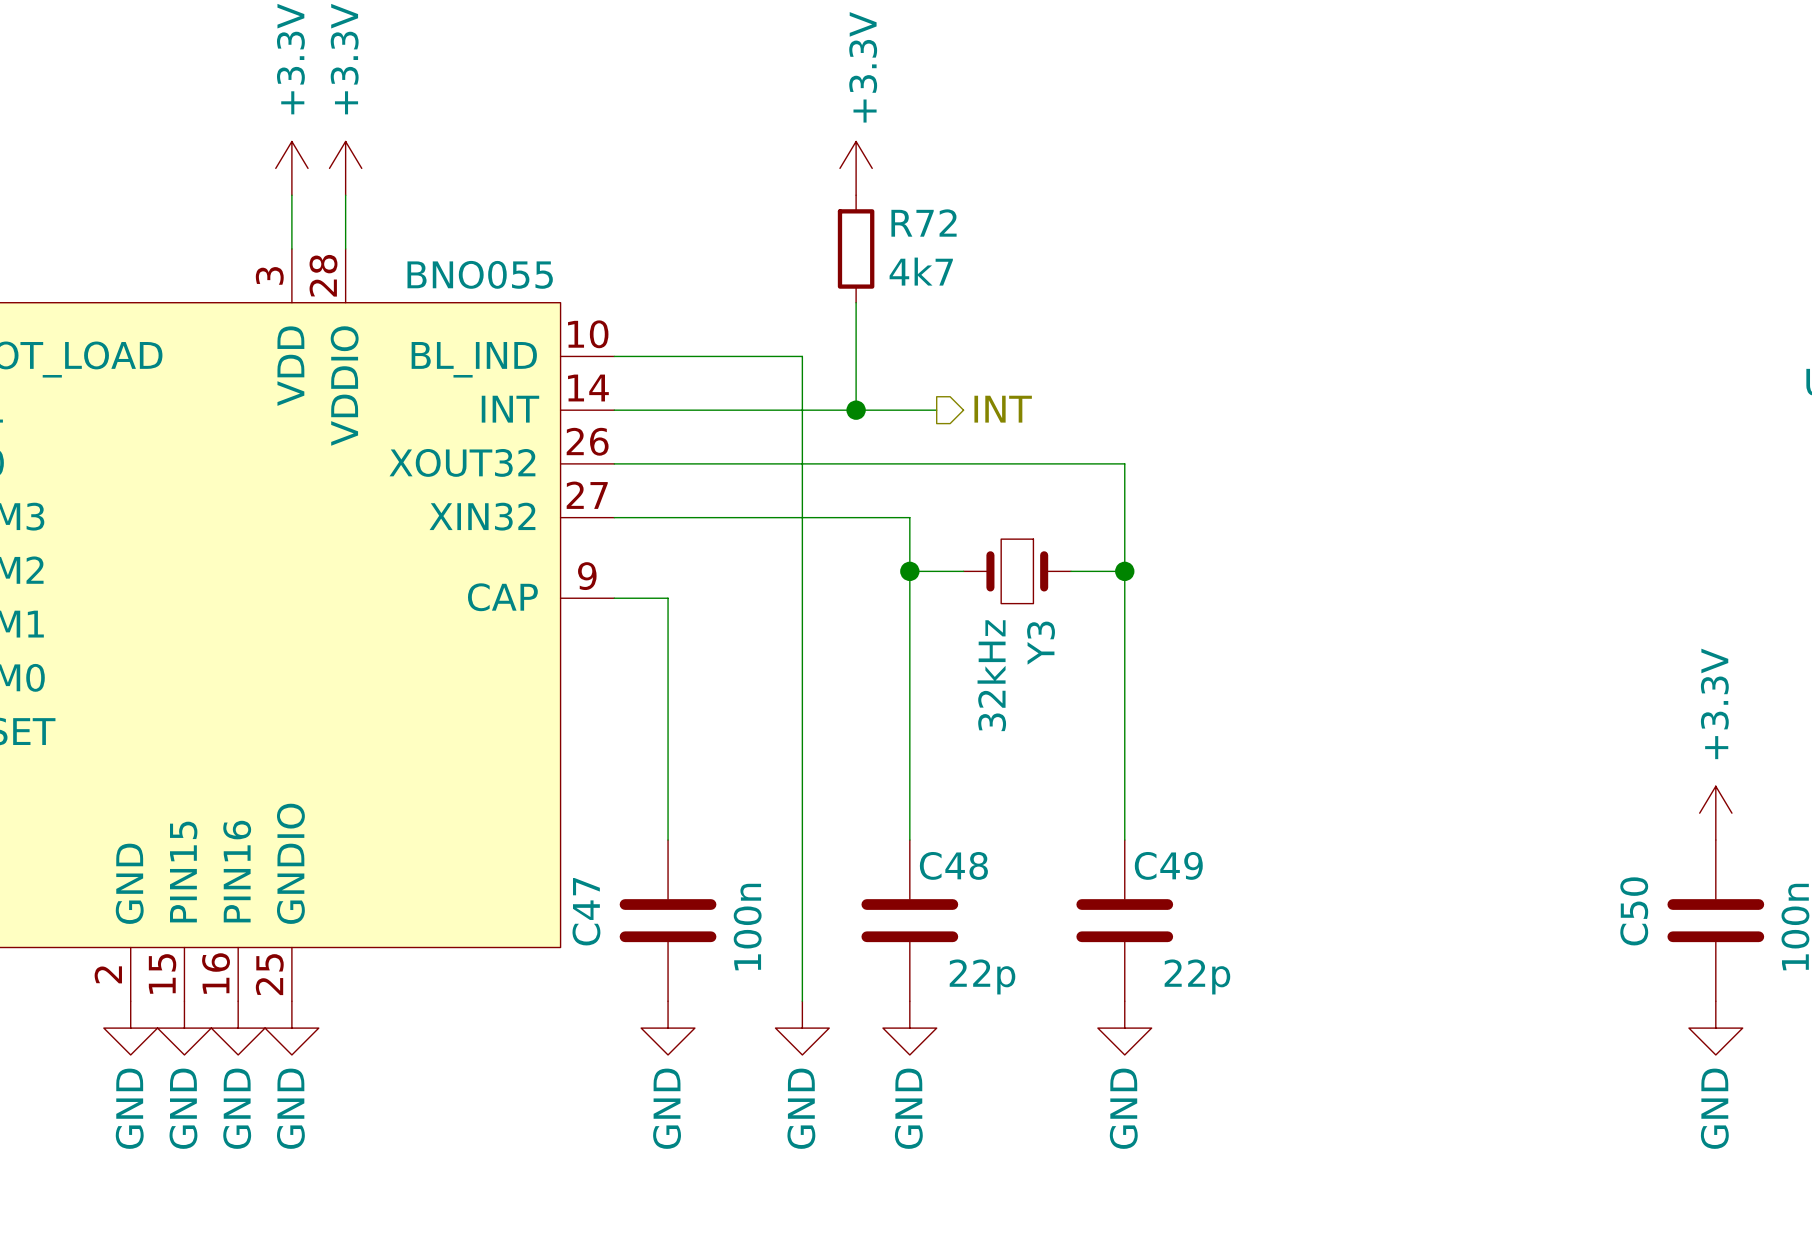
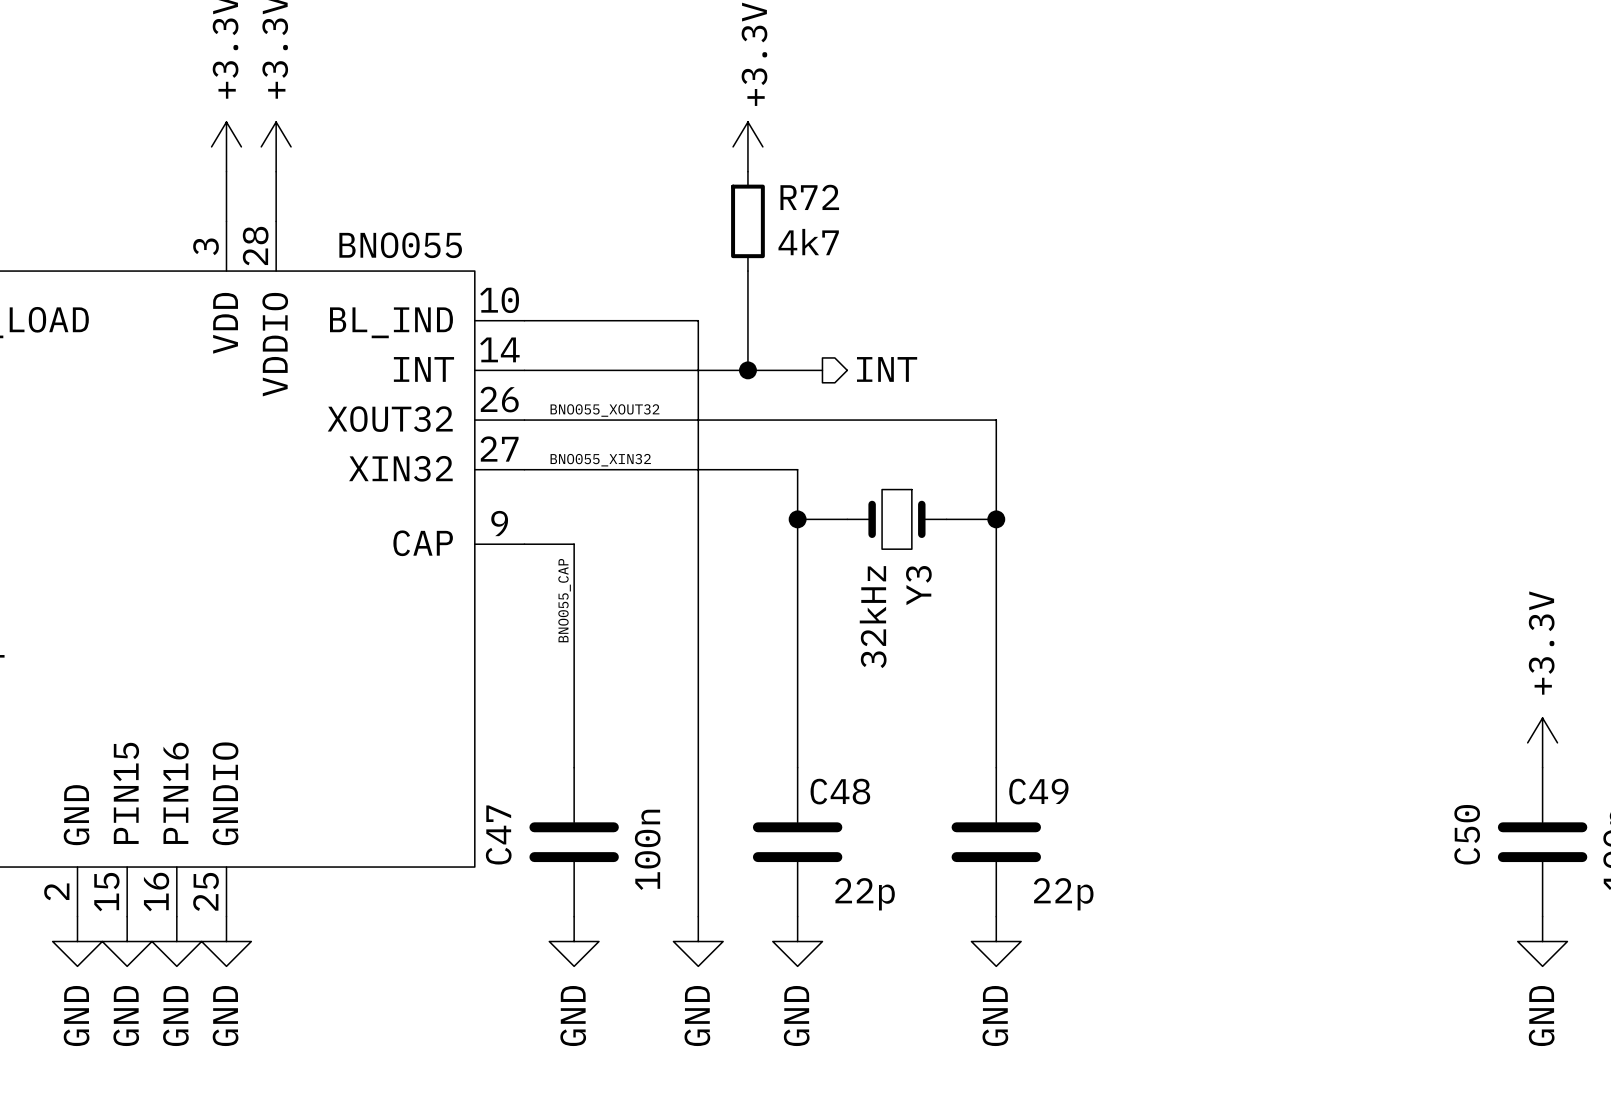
label: none -> BNO055_XOUT32 (604, 410)
label: none -> BNO055_XIN32 (600, 460)
label: none -> BNO055_CAP (564, 600)

